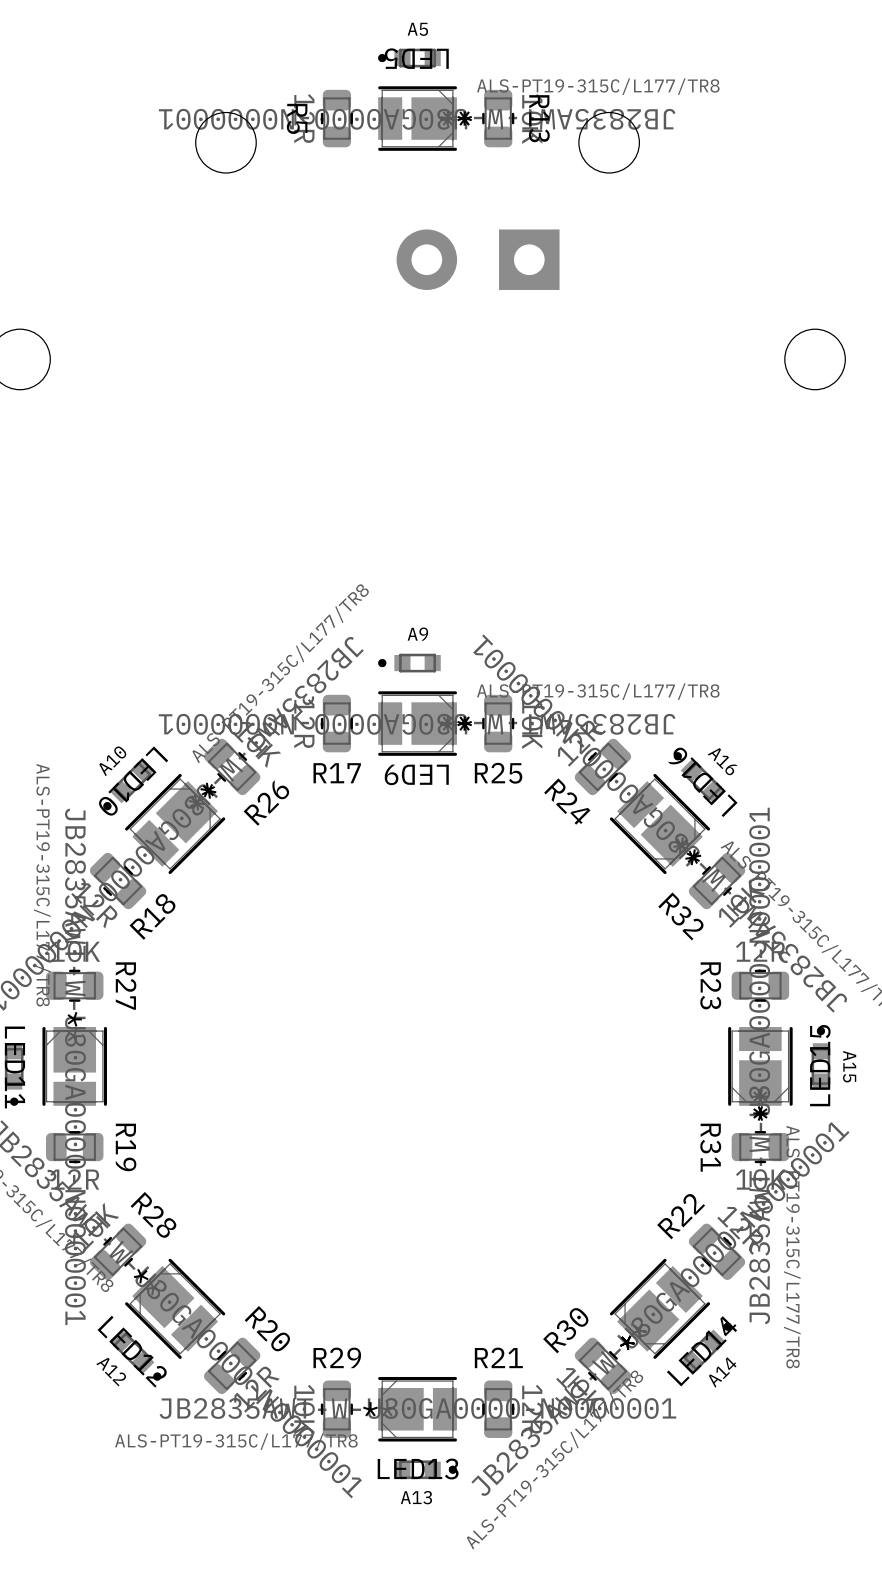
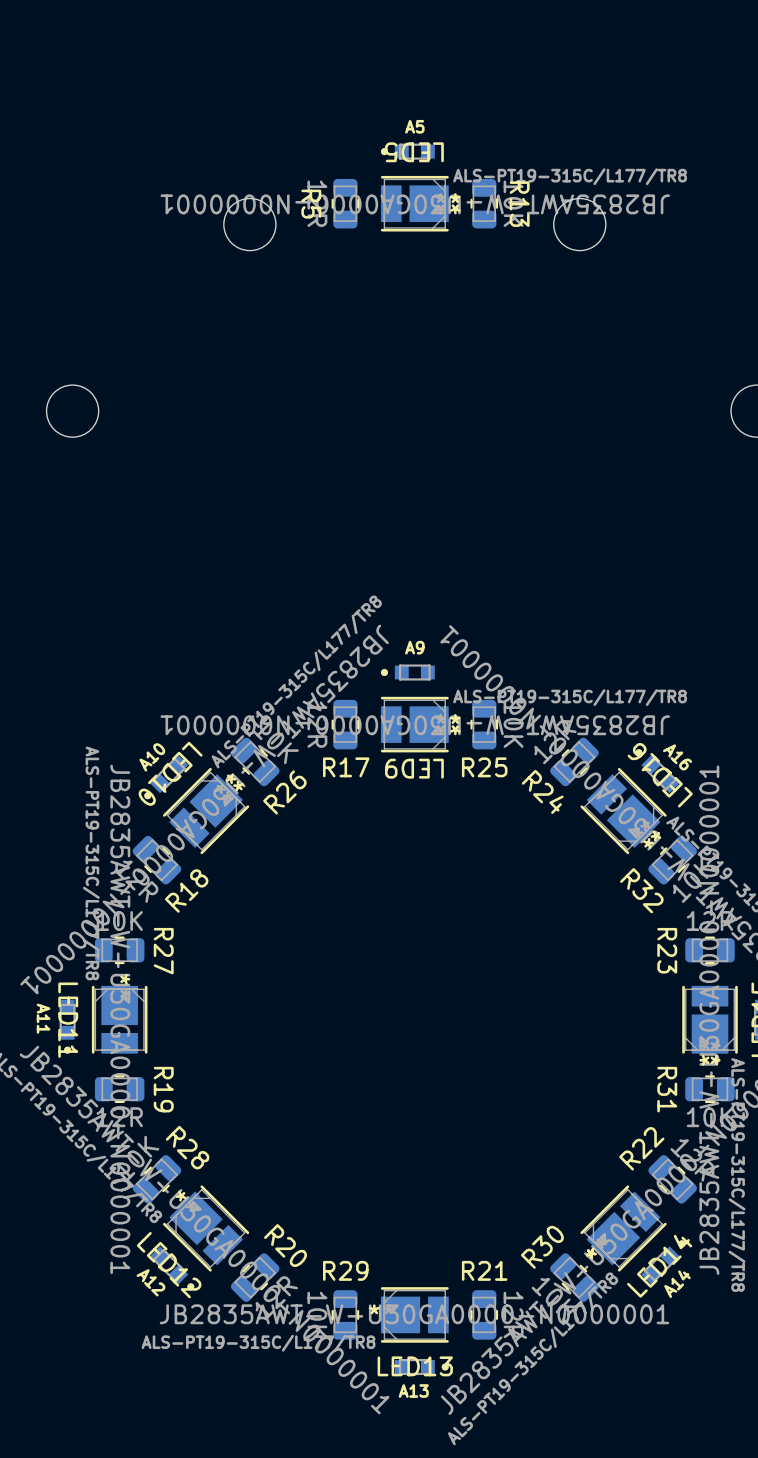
part: (478, 259) -> none

